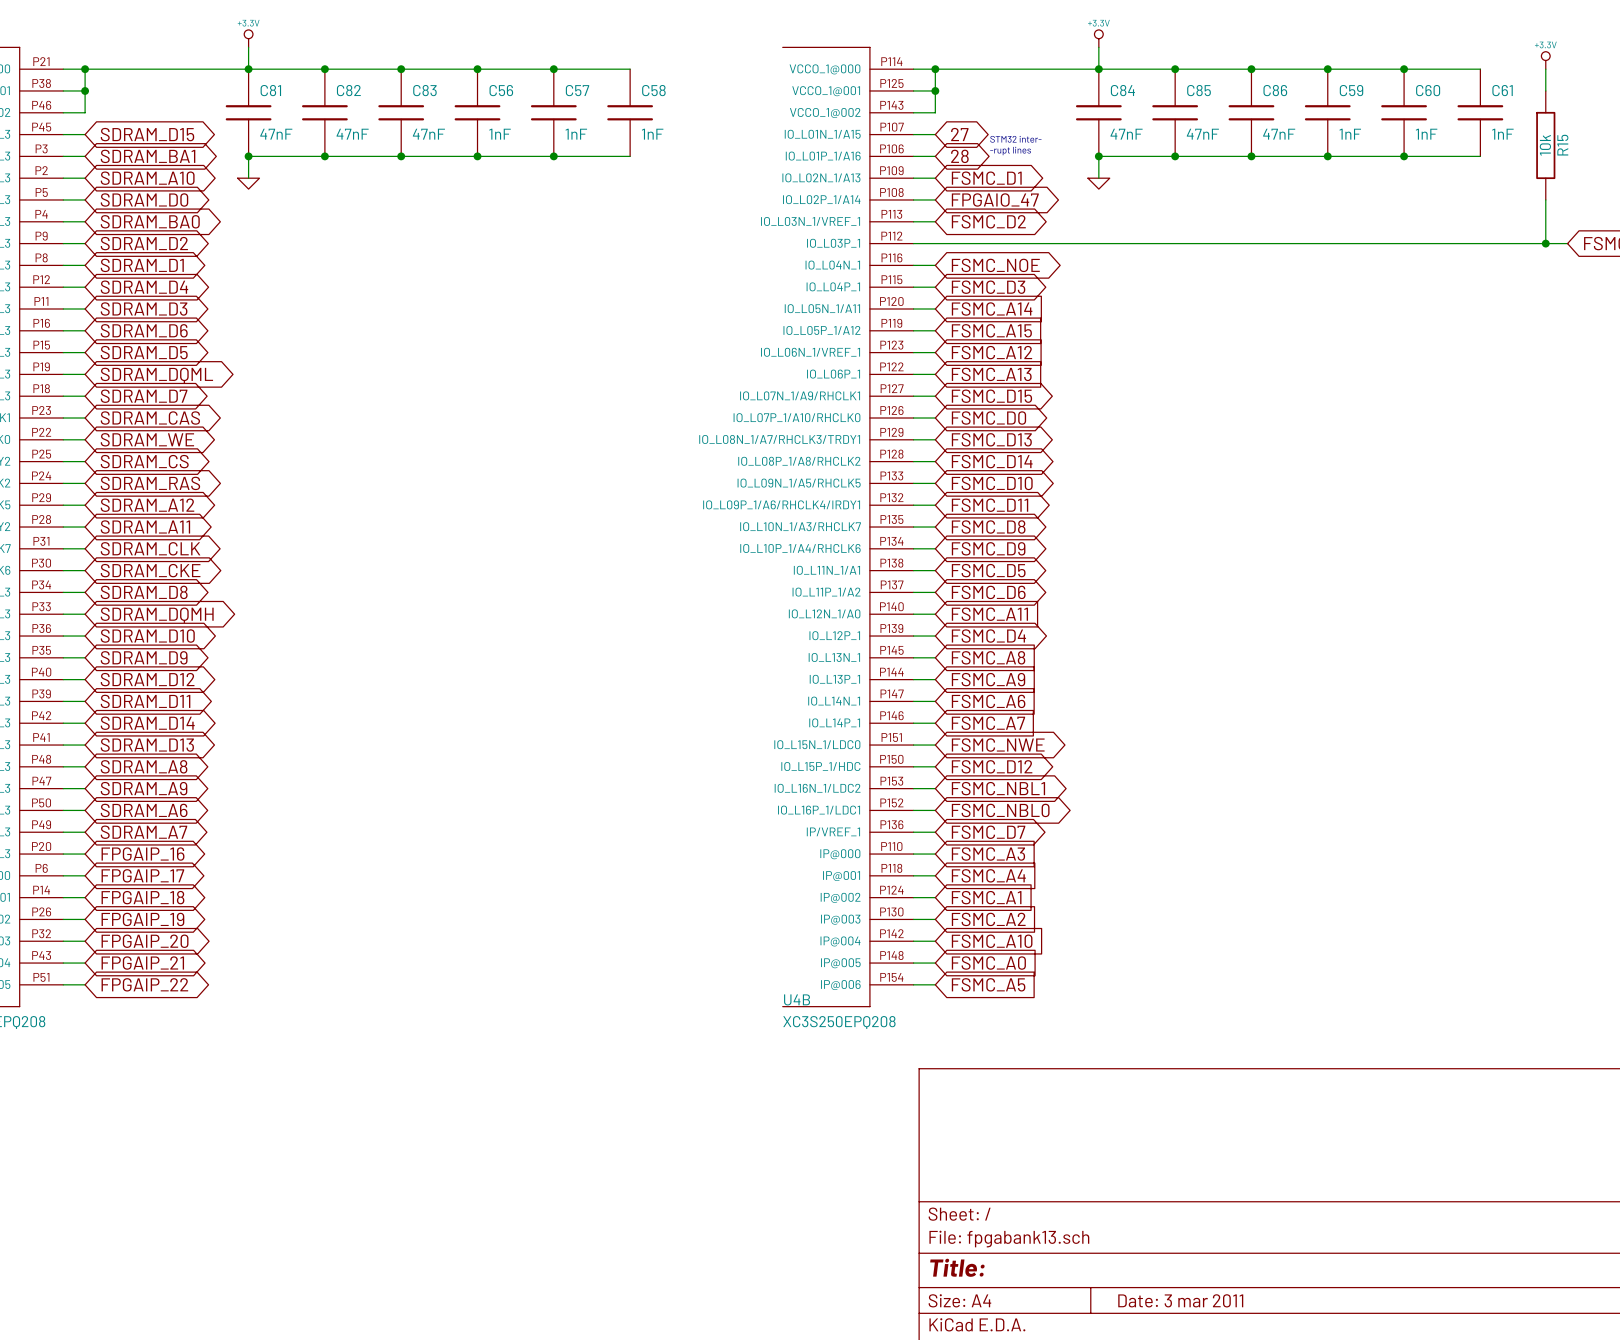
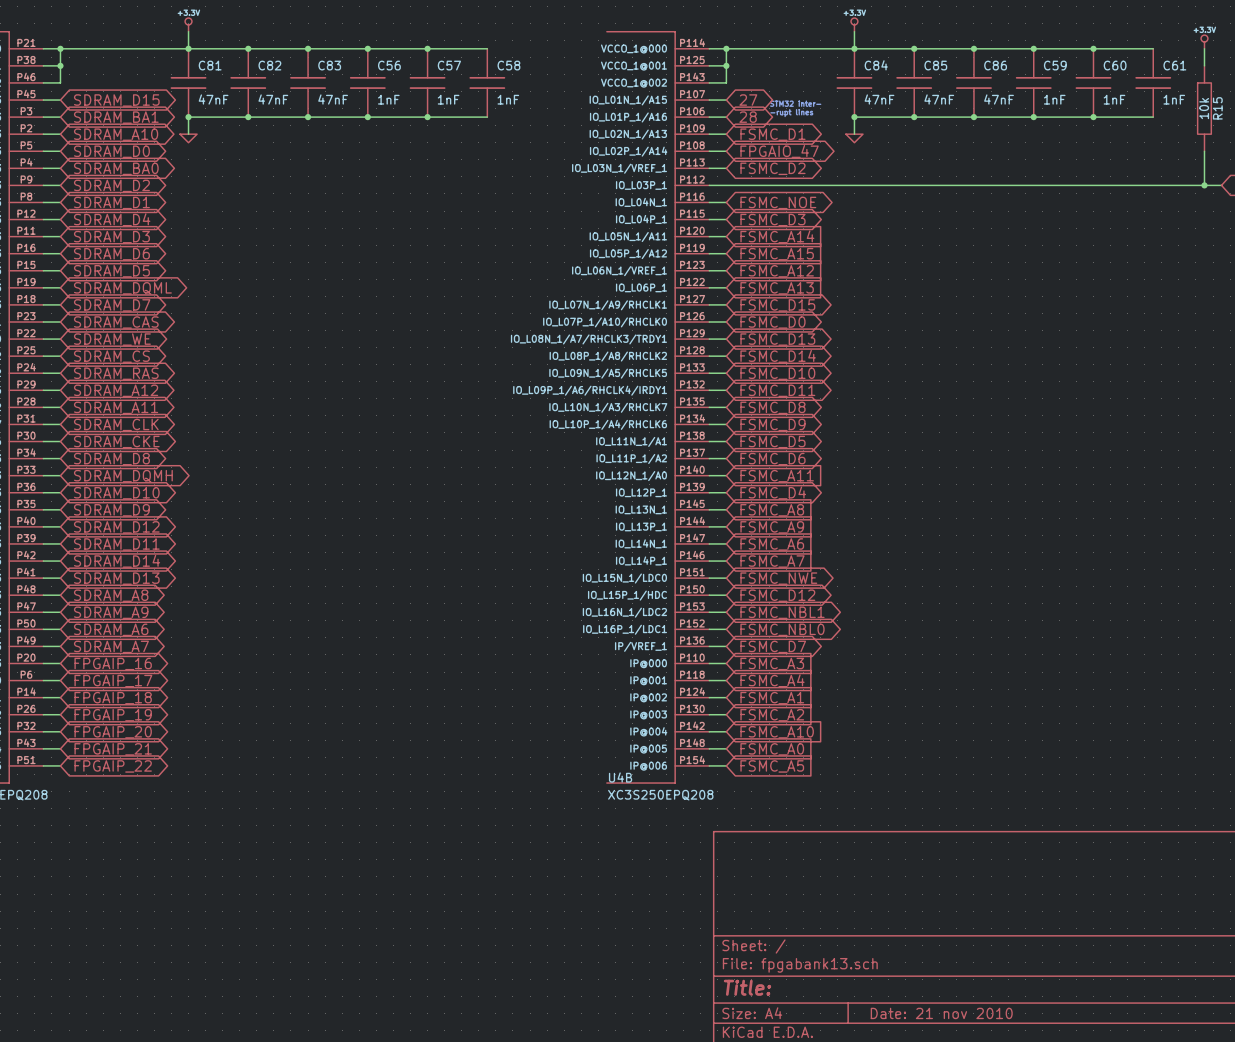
title block: Date: 3 mar 2011 (1180, 1300) -> Date: 21 nov 2010 (941, 1013)

